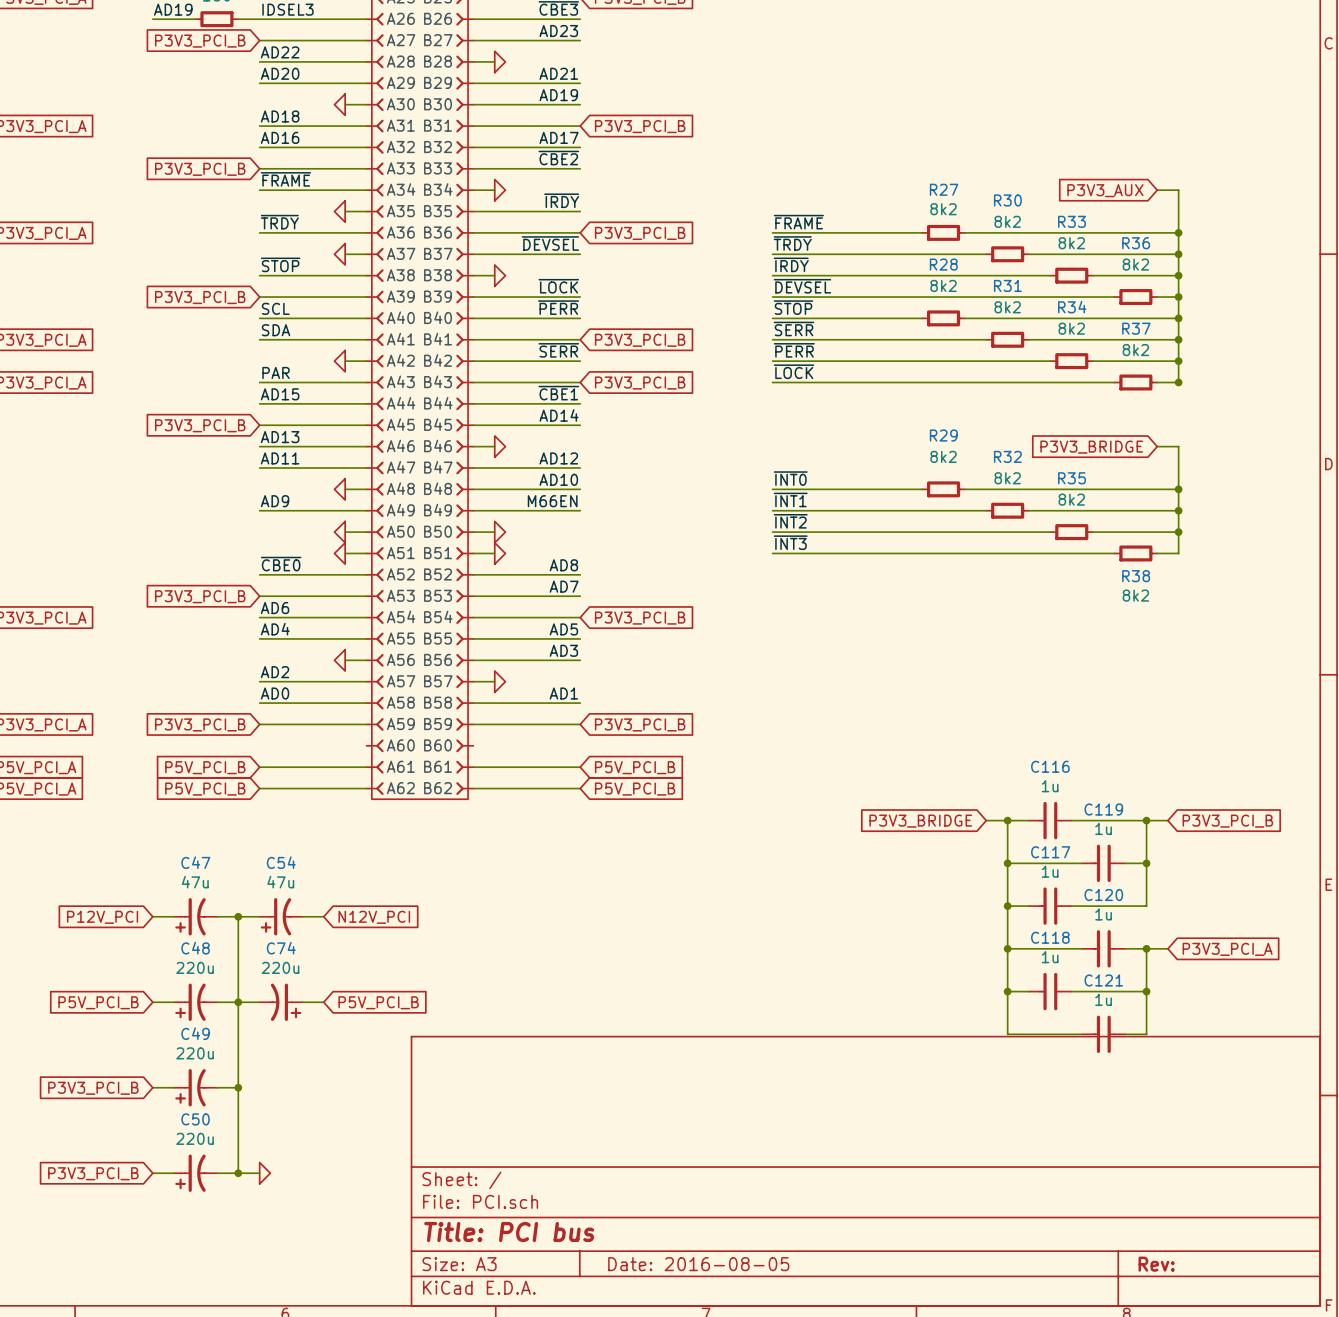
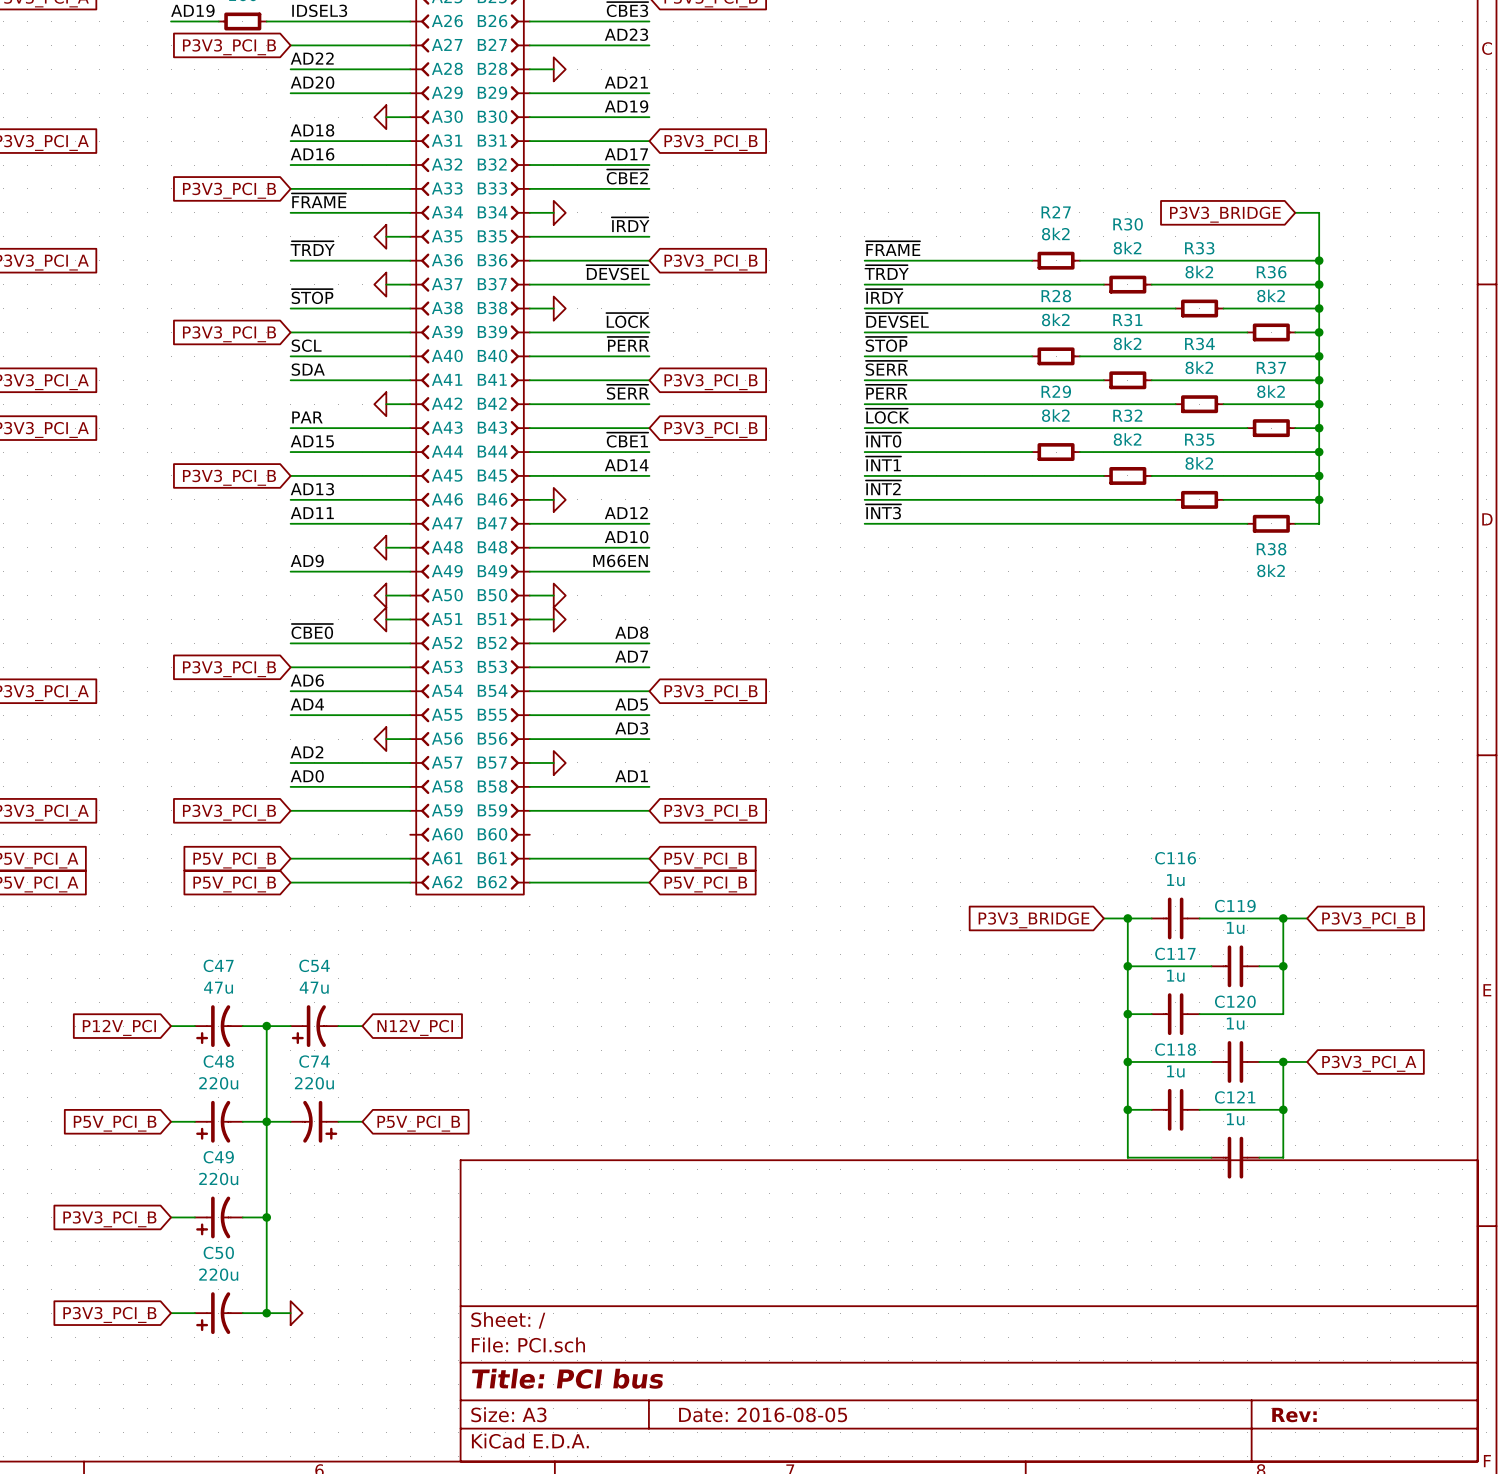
global label: P3V3_AUX (1105, 190) -> P3V3_BRIDGE (1225, 214)
wire: none -> (1319, 428) (1319, 499)
junction: none -> (1319, 452)
junction: none -> (1319, 475)
wire: none -> (1223, 499) (1295, 499)
junction: none -> (1319, 499)
global label: P3V3_BRIDGE (1091, 447) -> none
wire: (1178, 467) (1178, 553) (1157, 553) -> (1319, 523) (1295, 523)
label position: ~{INT0} (790, 478) -> ~{INT0} (883, 440)
wire: (772, 489) (922, 489) -> (864, 452) (1032, 452)
R29 position: (943, 489) -> (1056, 452)
wire: (964, 489) (1178, 489) -> (1079, 452) (1319, 452)
junction: (1178, 489) -> none
label position: ~{INT1} (790, 499) -> ~{INT1} (883, 463)
wire: (772, 510) (986, 510) -> (864, 475) (1103, 475)
R32 position: (1007, 510) -> (1127, 475)
wire: (1029, 510) (1178, 510) -> (1151, 475) (1319, 475)
junction: (1178, 510) -> none
label position: ~{INT2} (790, 521) -> ~{INT2} (883, 487)
wire: (772, 532) (1050, 532) -> (864, 499) (1175, 499)
R35 position: (1071, 532) -> (1199, 499)
wire: (1093, 532) (1178, 532) -> none
junction: (1178, 532) -> none
label position: ~{INT3} (790, 542) -> ~{INT3} (883, 511)
wire: (772, 553) (1114, 553) -> (864, 523) (1247, 523)
R38 position: (1135, 553) -> (1271, 523)

